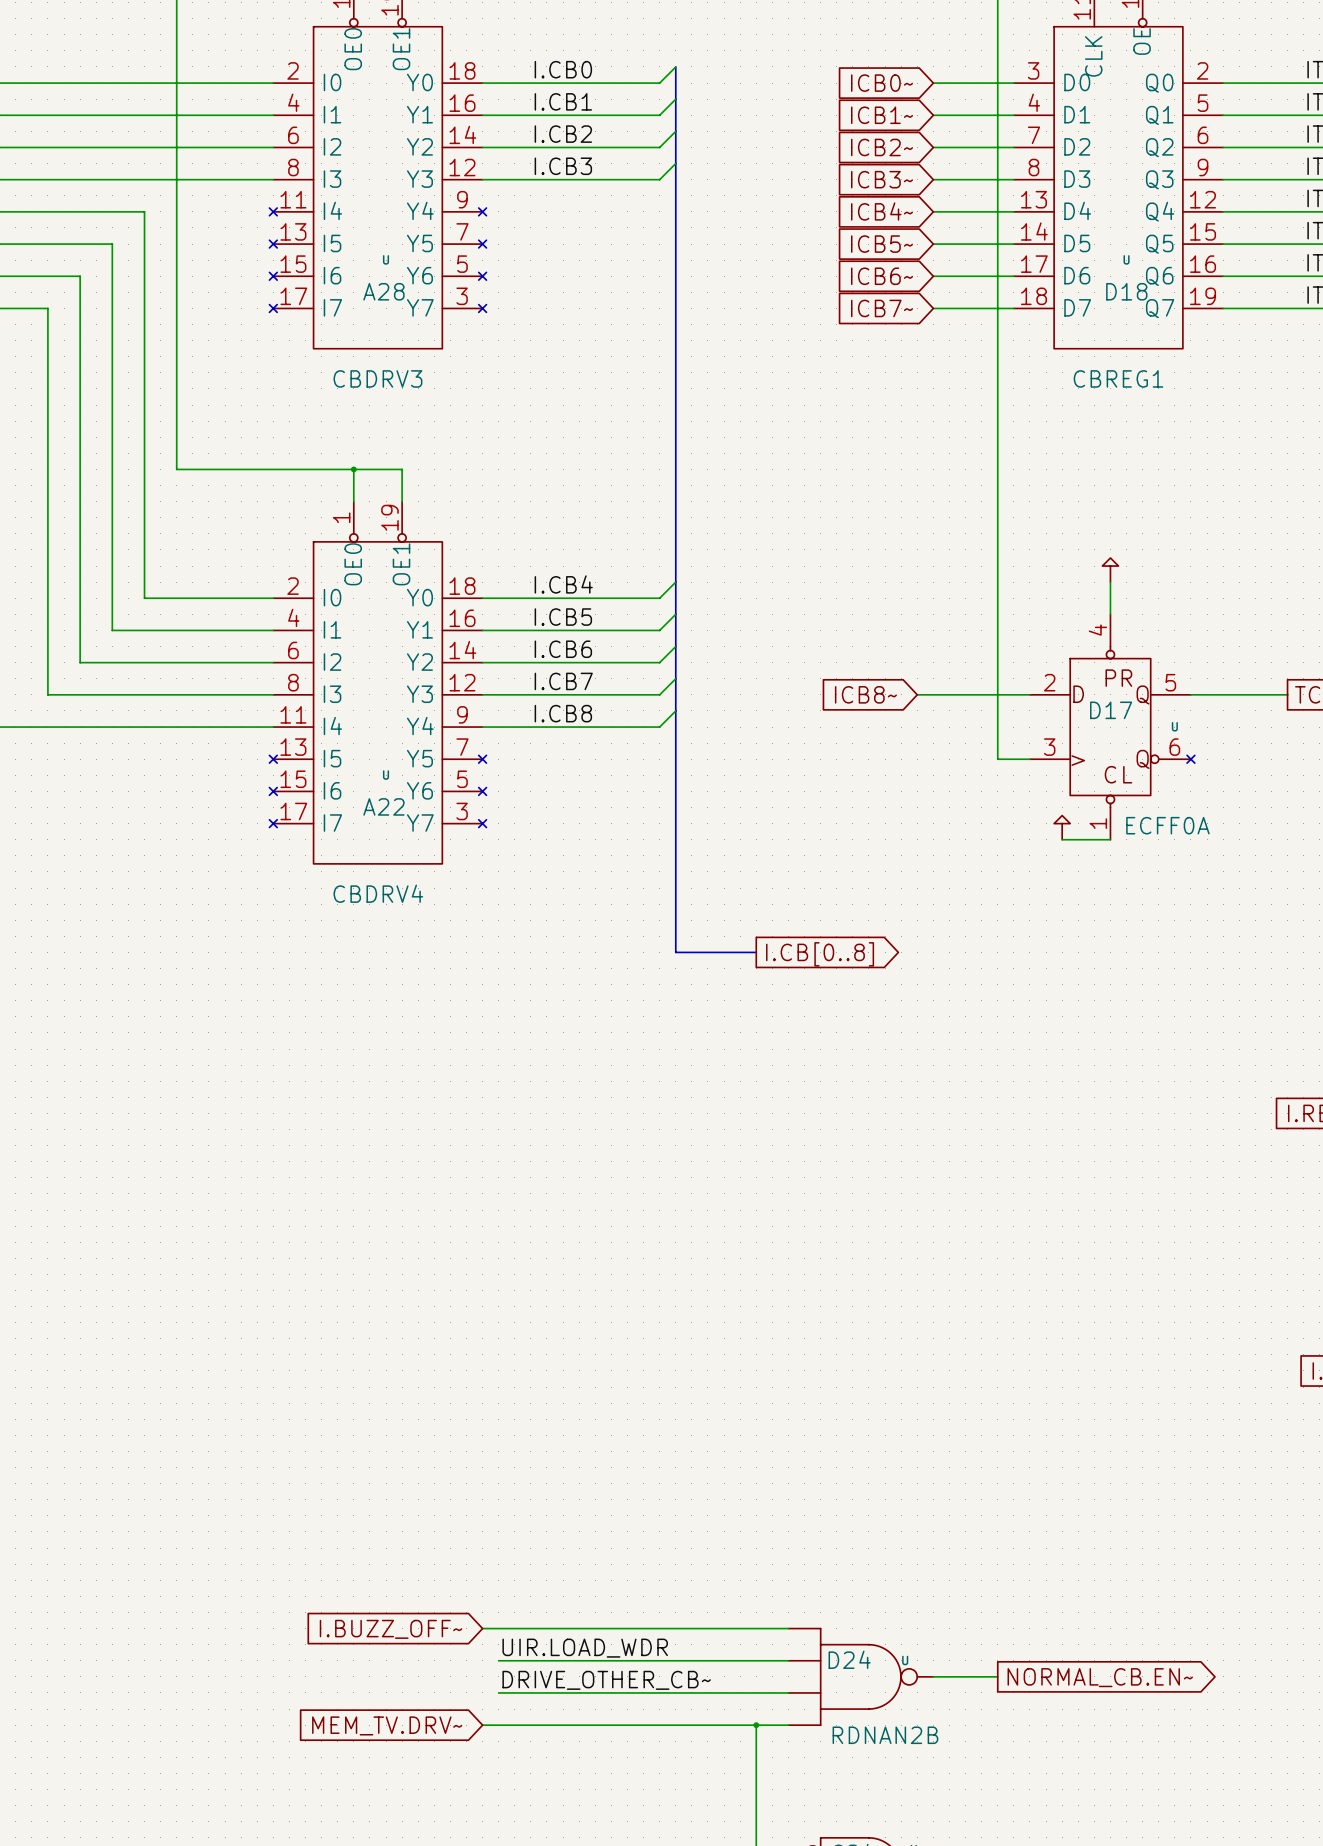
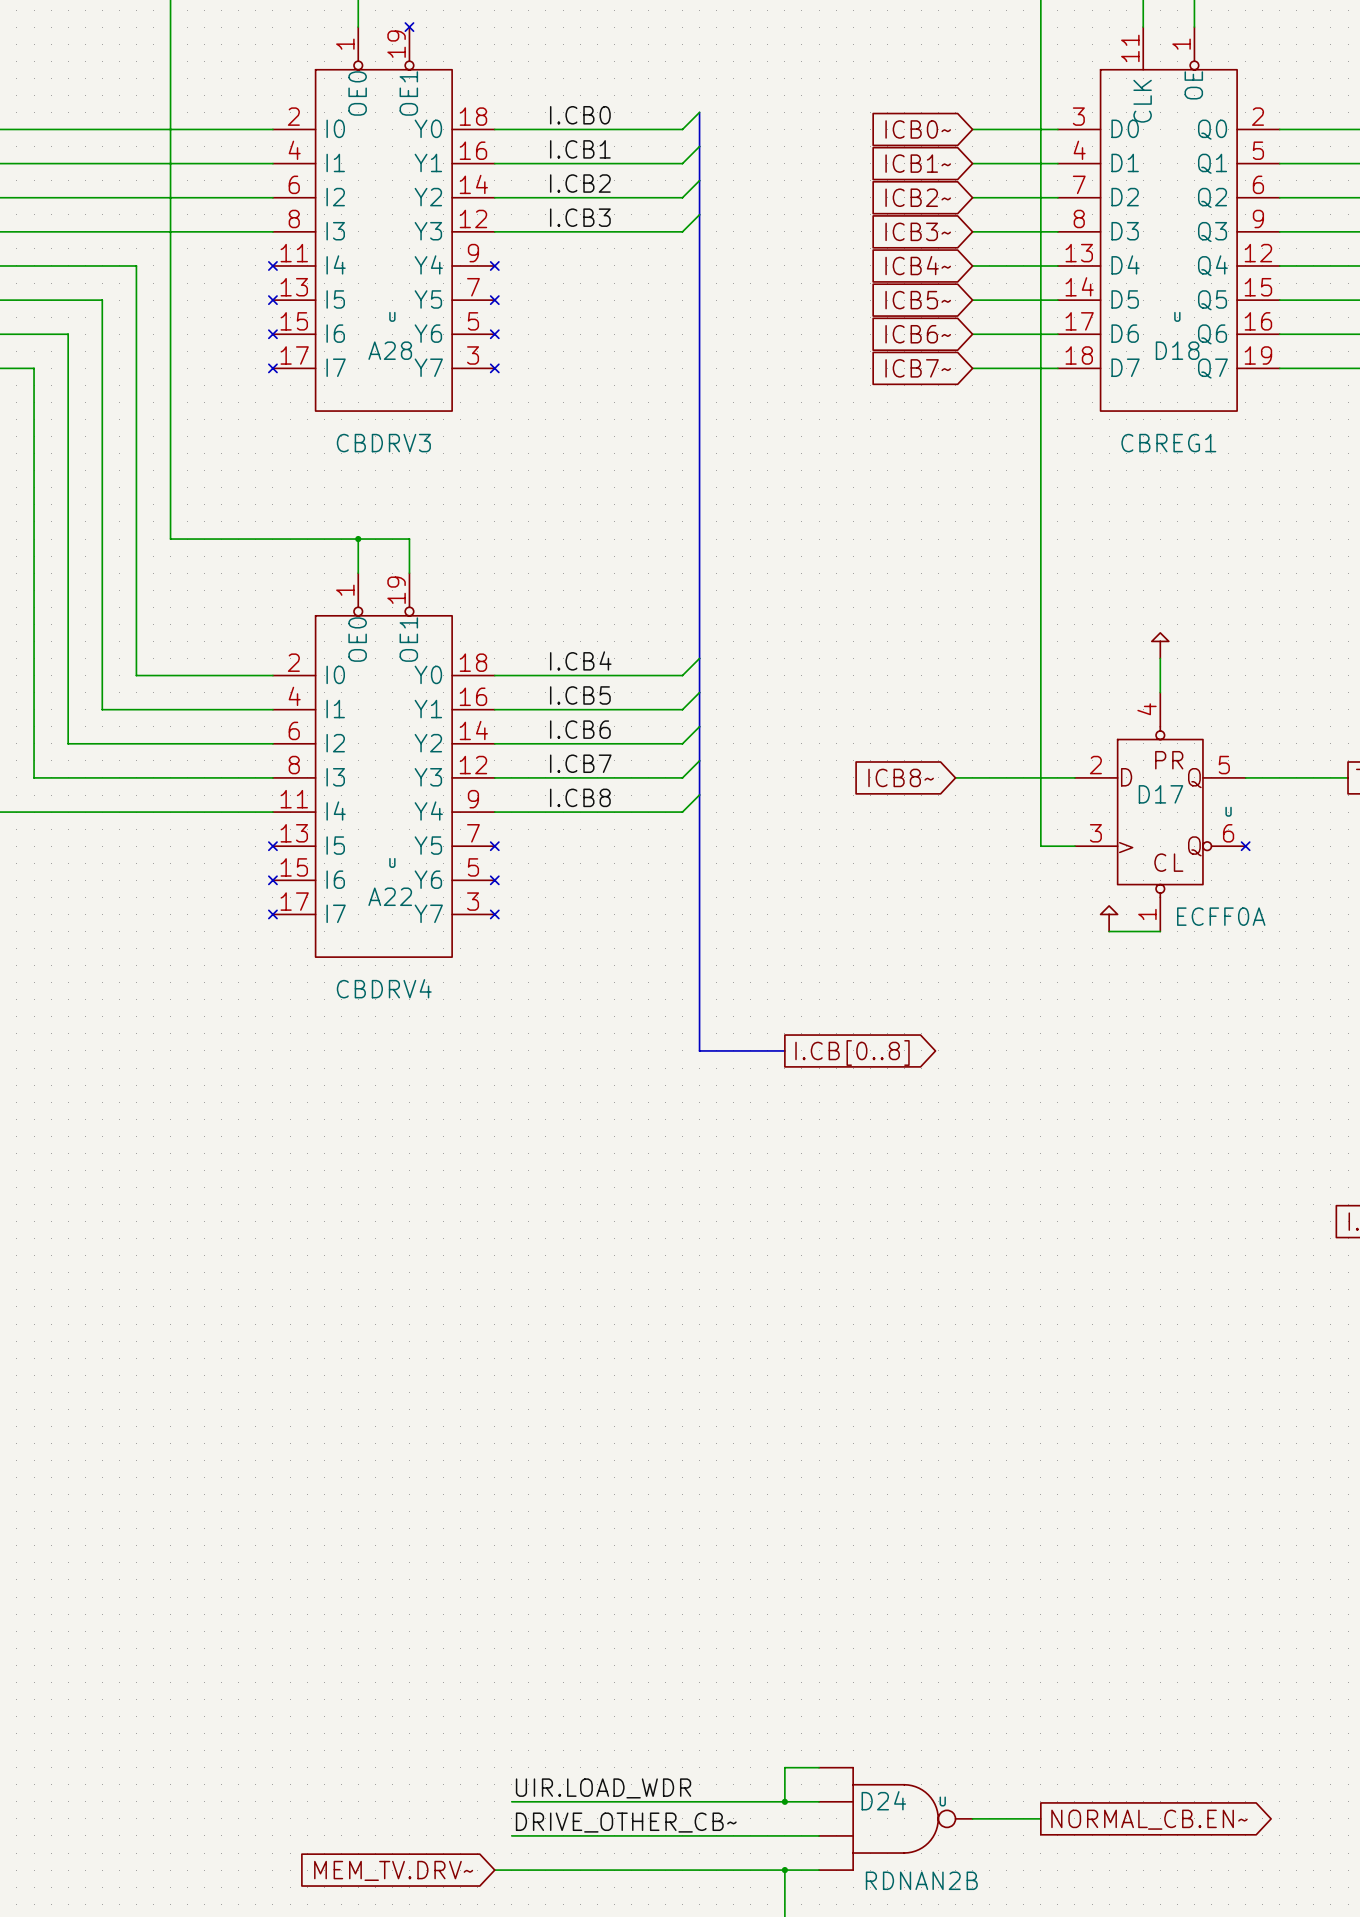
wire: (482, 1628) (756, 1628) -> (784, 1801) (784, 1767)
global label: I.BUZZ_OFF~ (391, 1629) -> none
junction: none -> (784, 1801)

